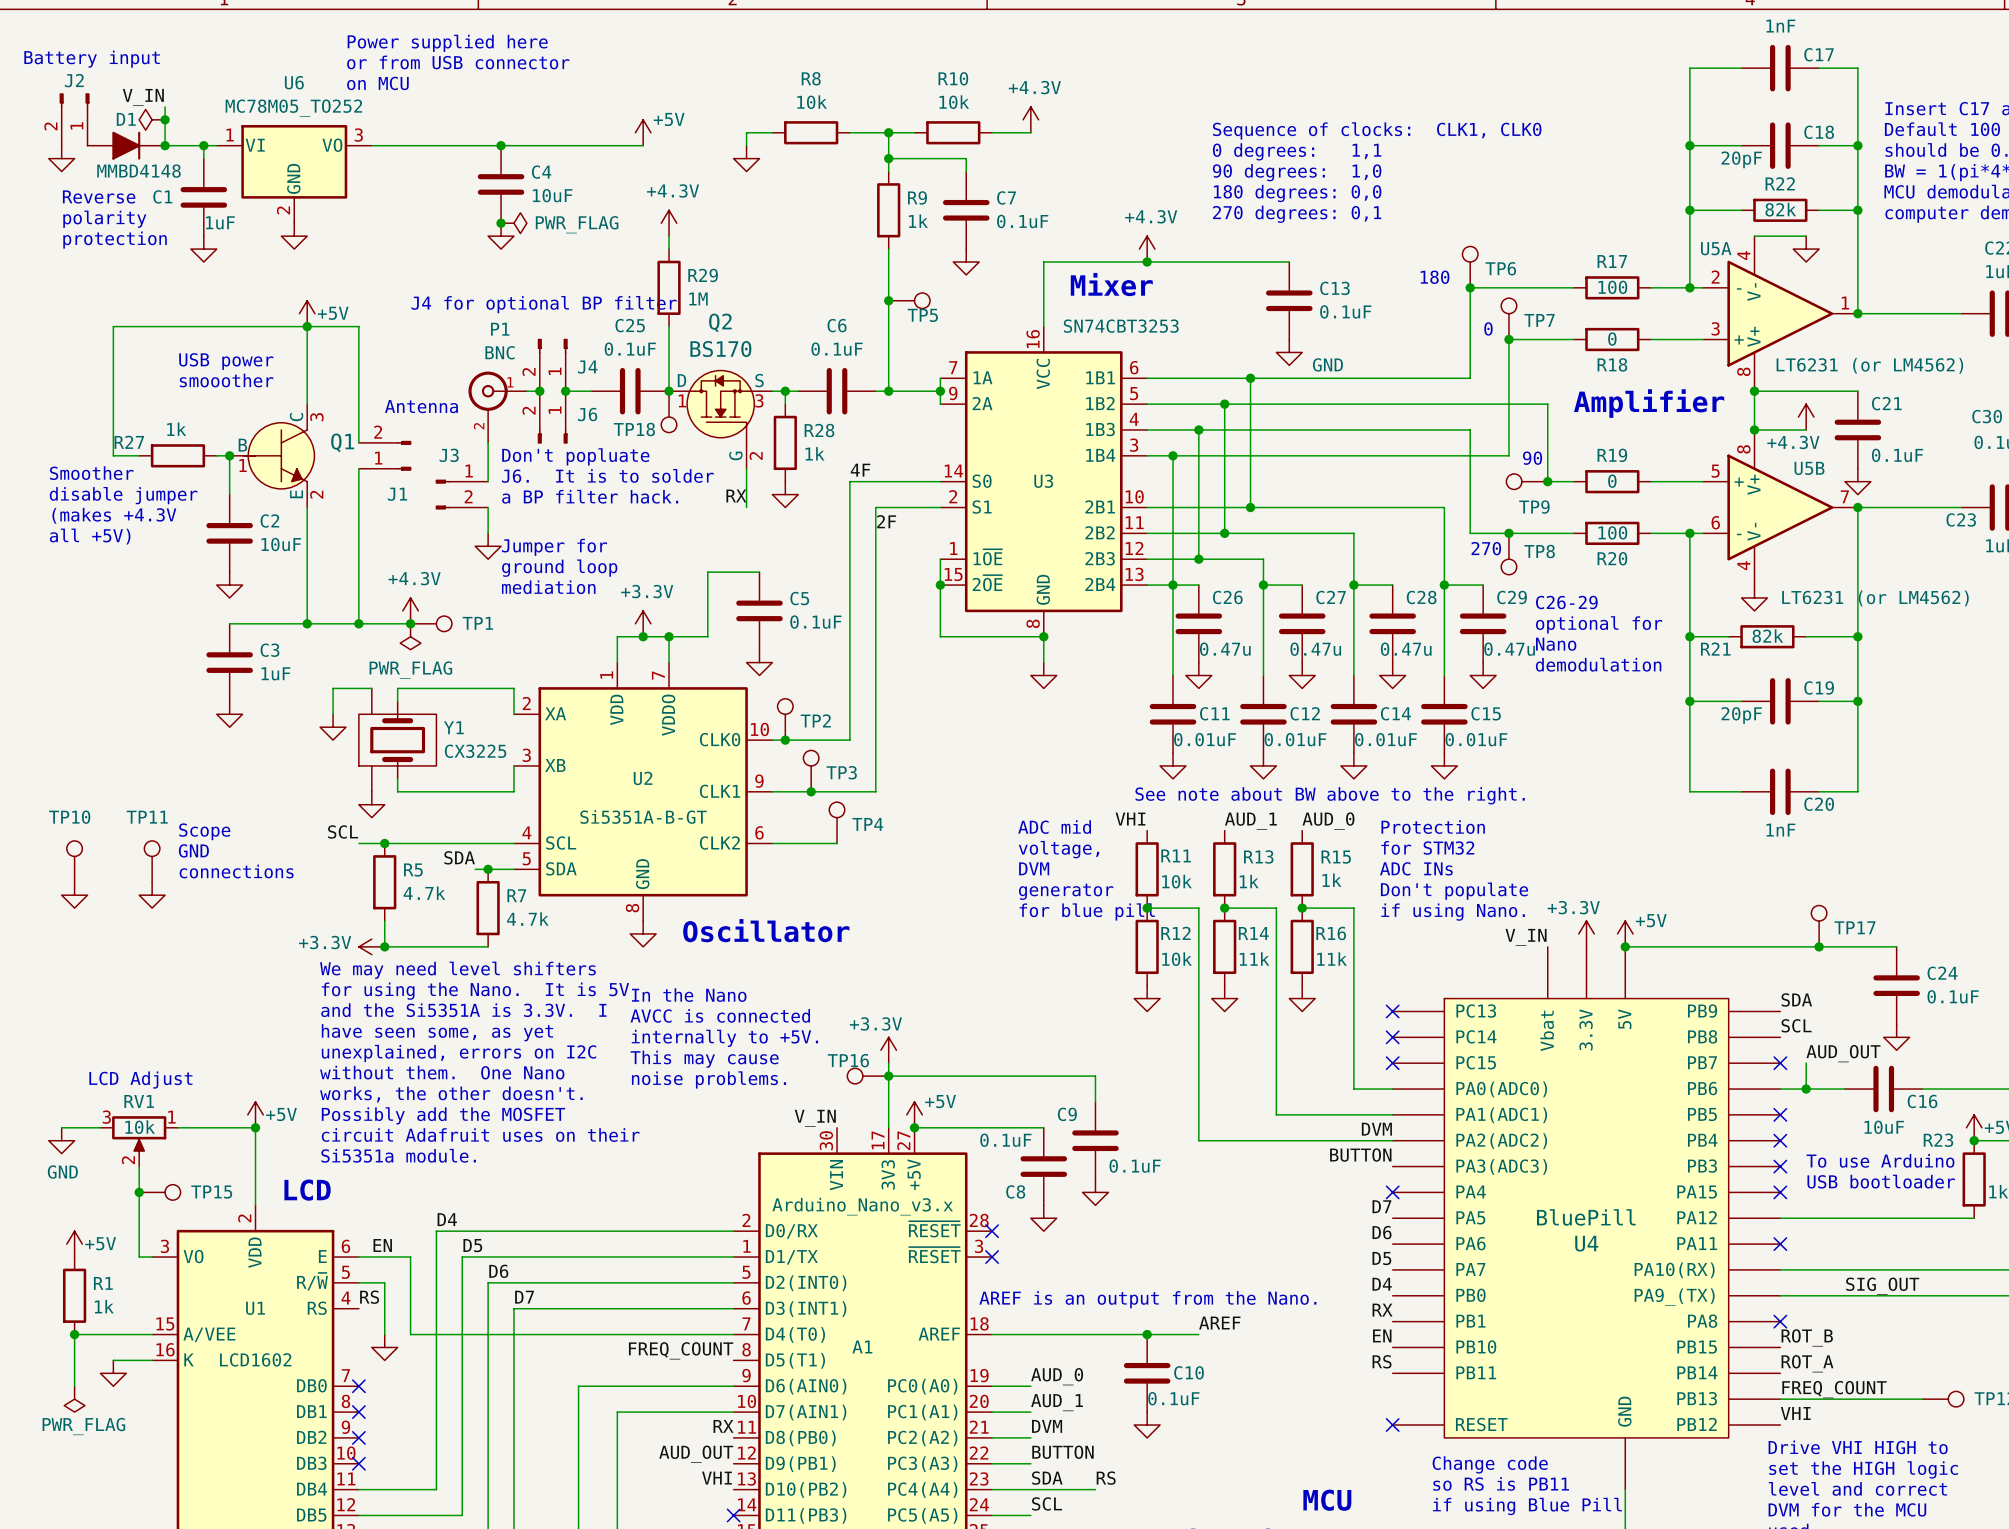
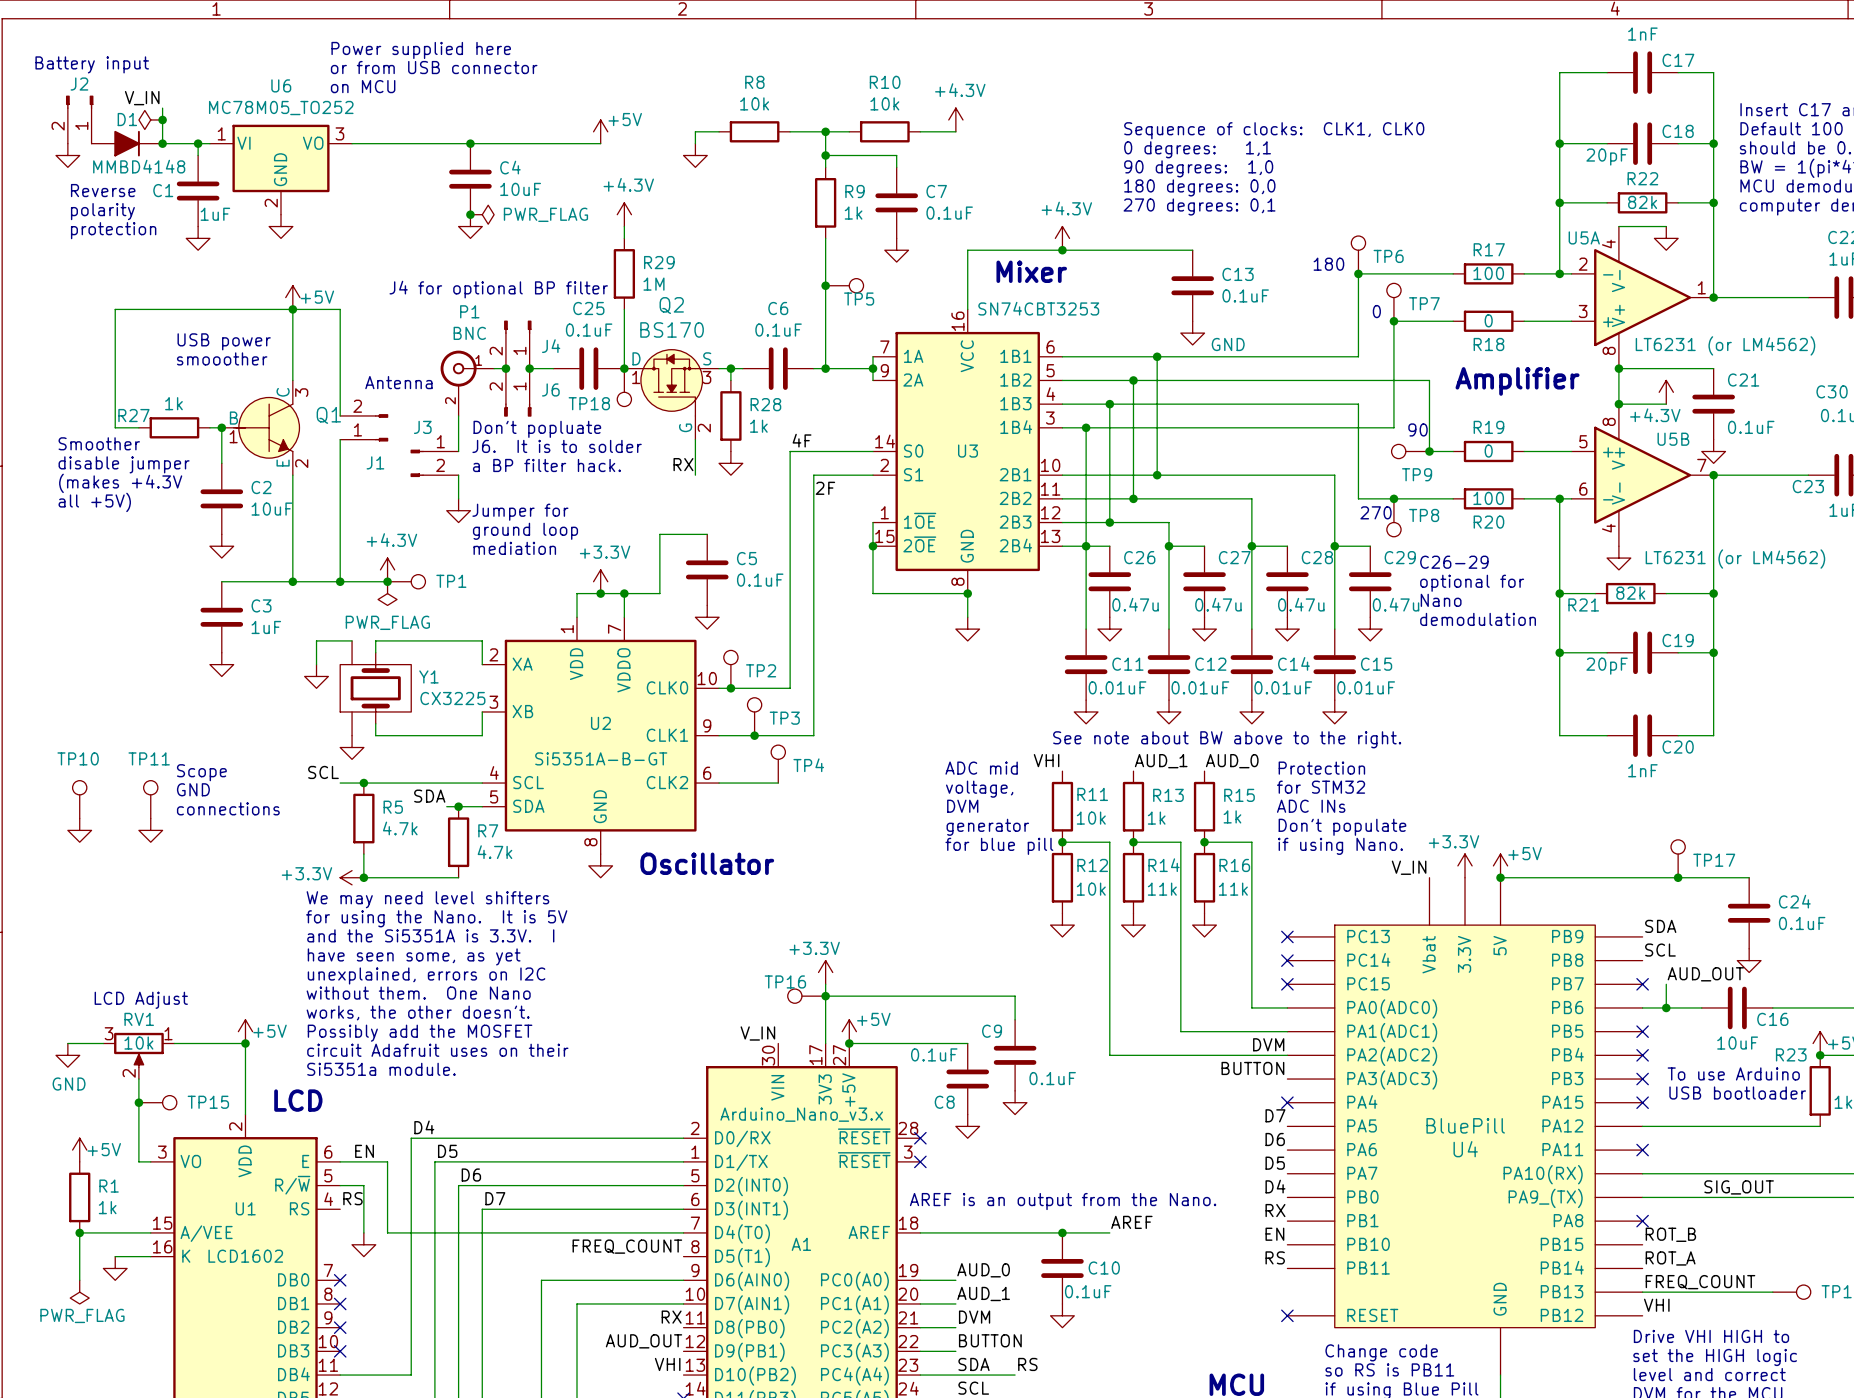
text: In the Nano (689, 995) -> none
text: AVCC is connected (720, 1015) -> none
text: internally to +5V. (724, 1038) -> none
text: This may cause (704, 1059) -> none
text: noise problems. (709, 1079) -> none

